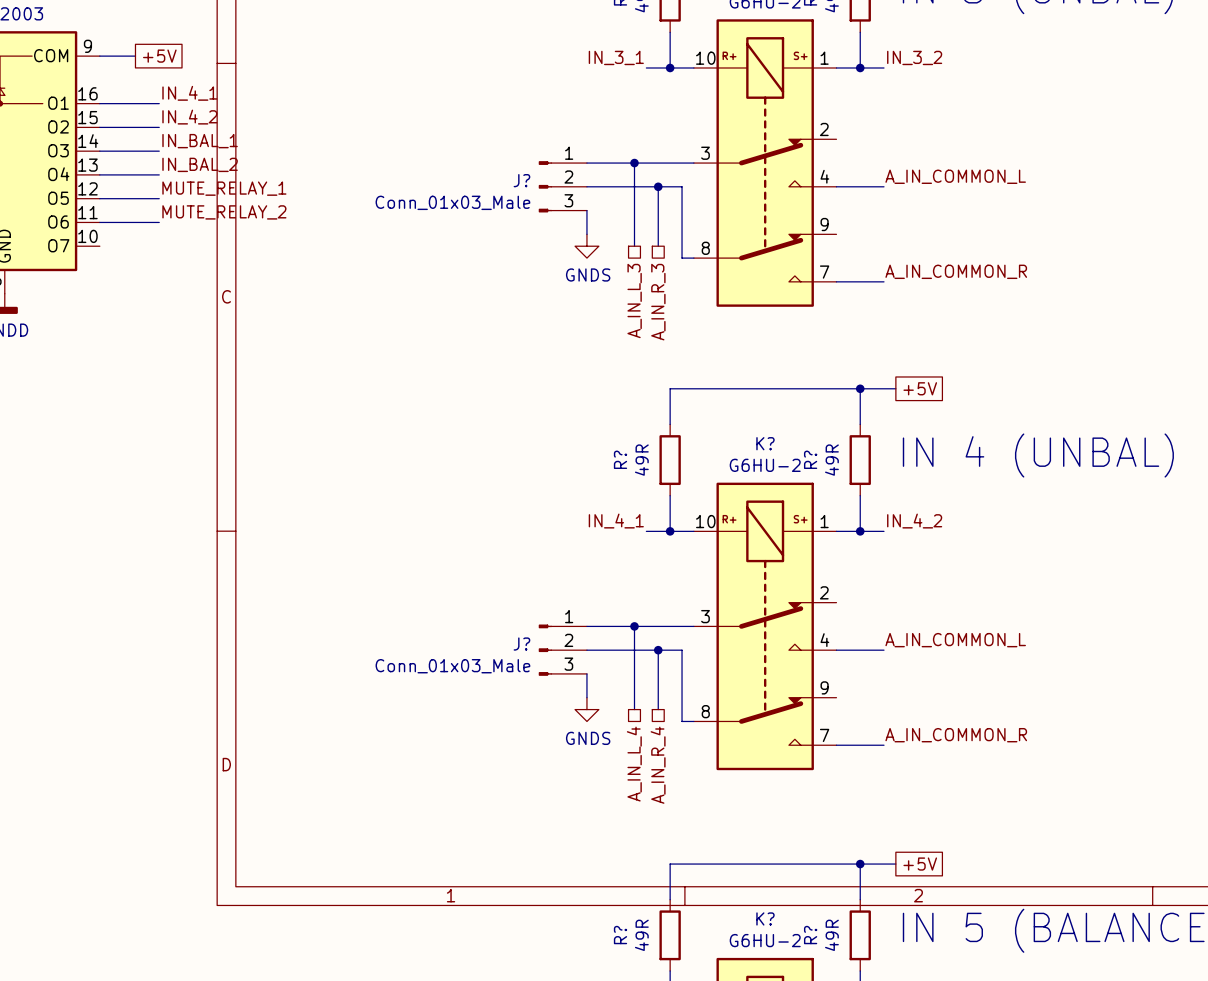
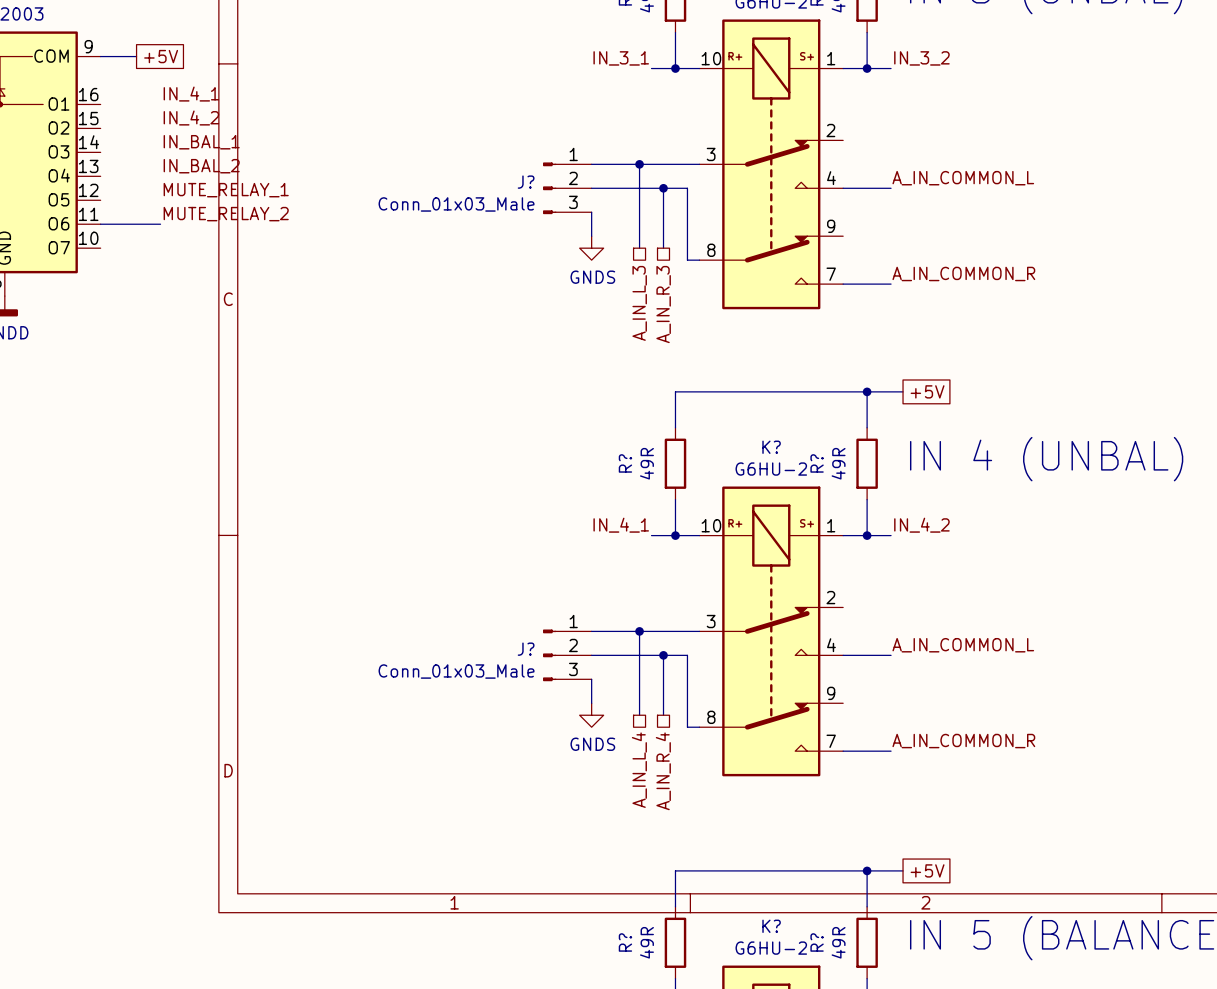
wire: (99, 103) (159, 103) -> none
wire: (99, 127) (159, 127) -> none
wire: (99, 151) (159, 151) -> none
wire: (99, 174) (159, 174) -> none
wire: (99, 198) (159, 198) -> none

